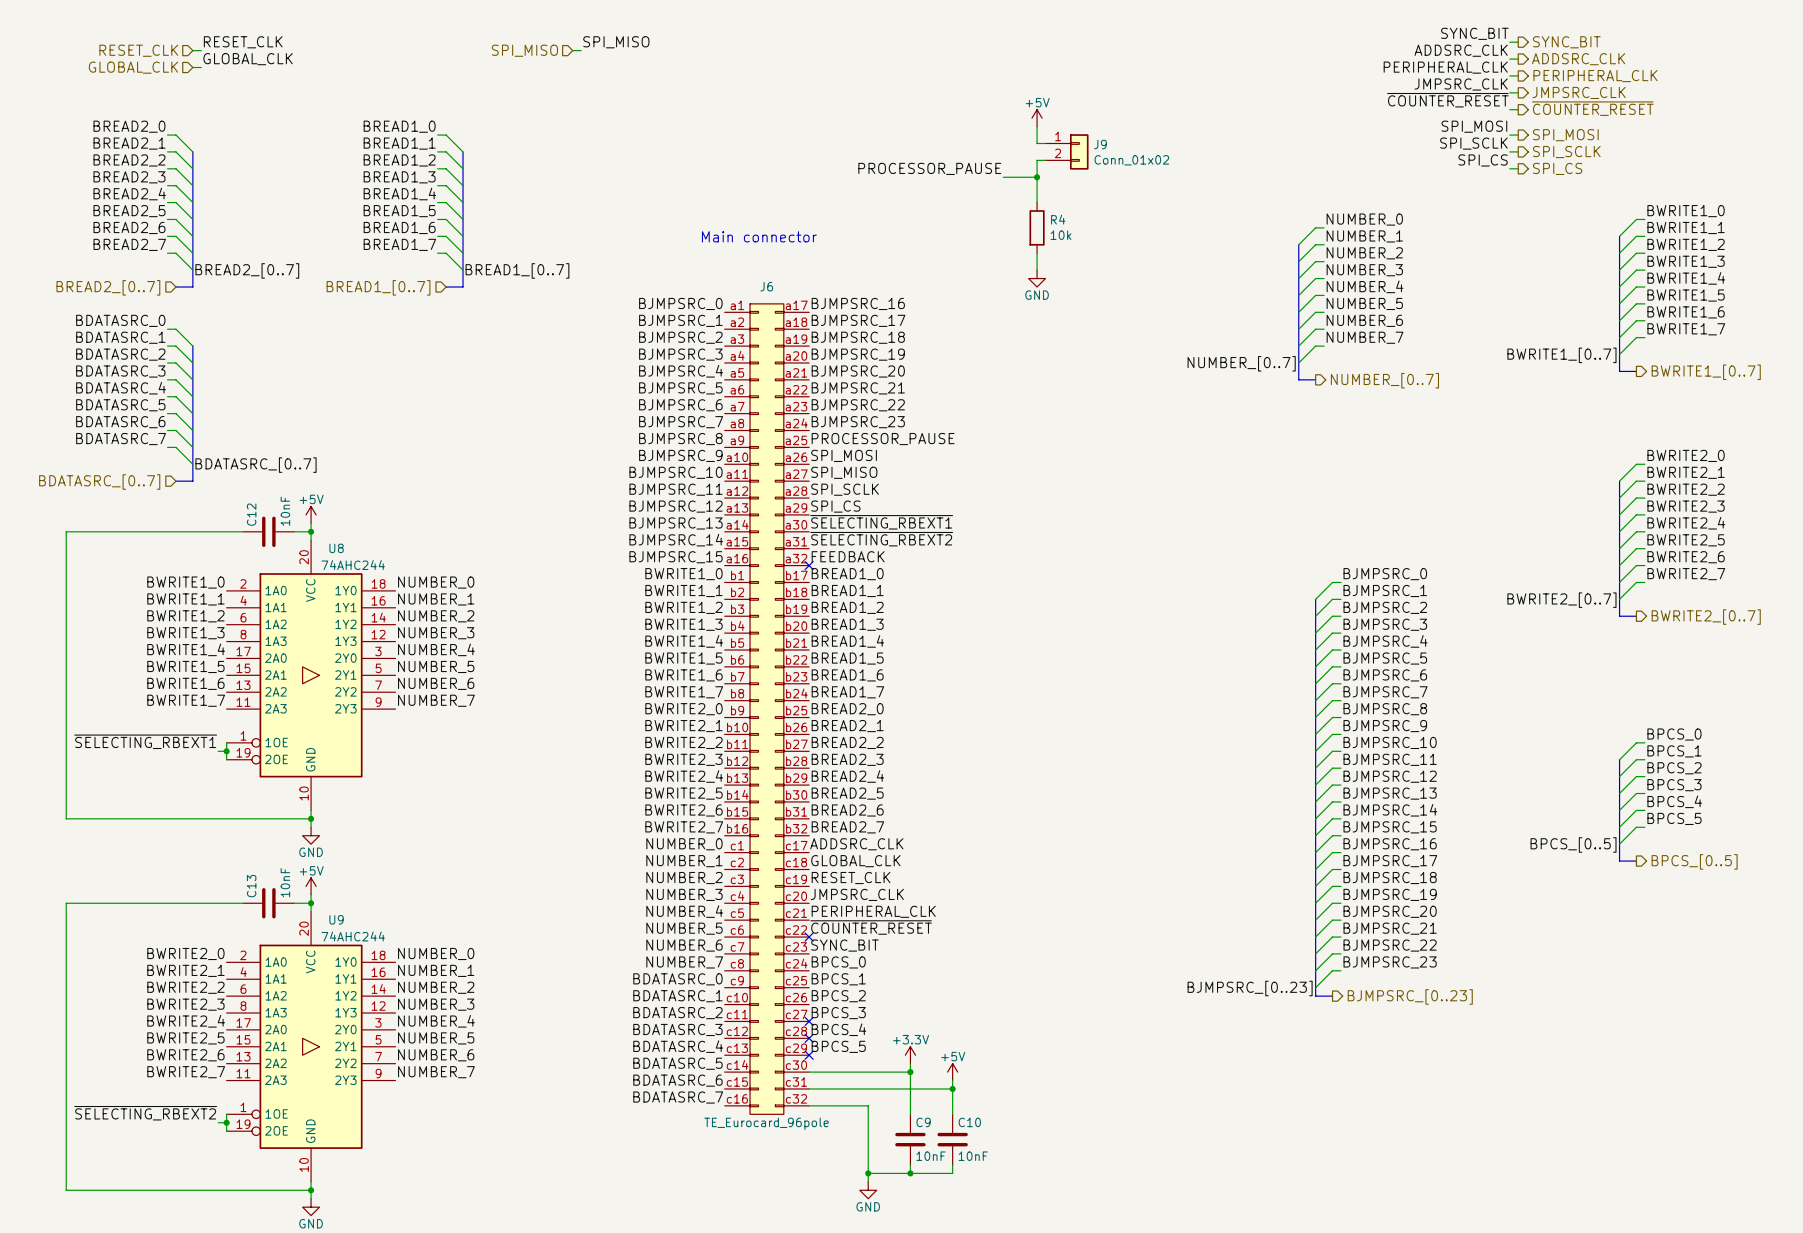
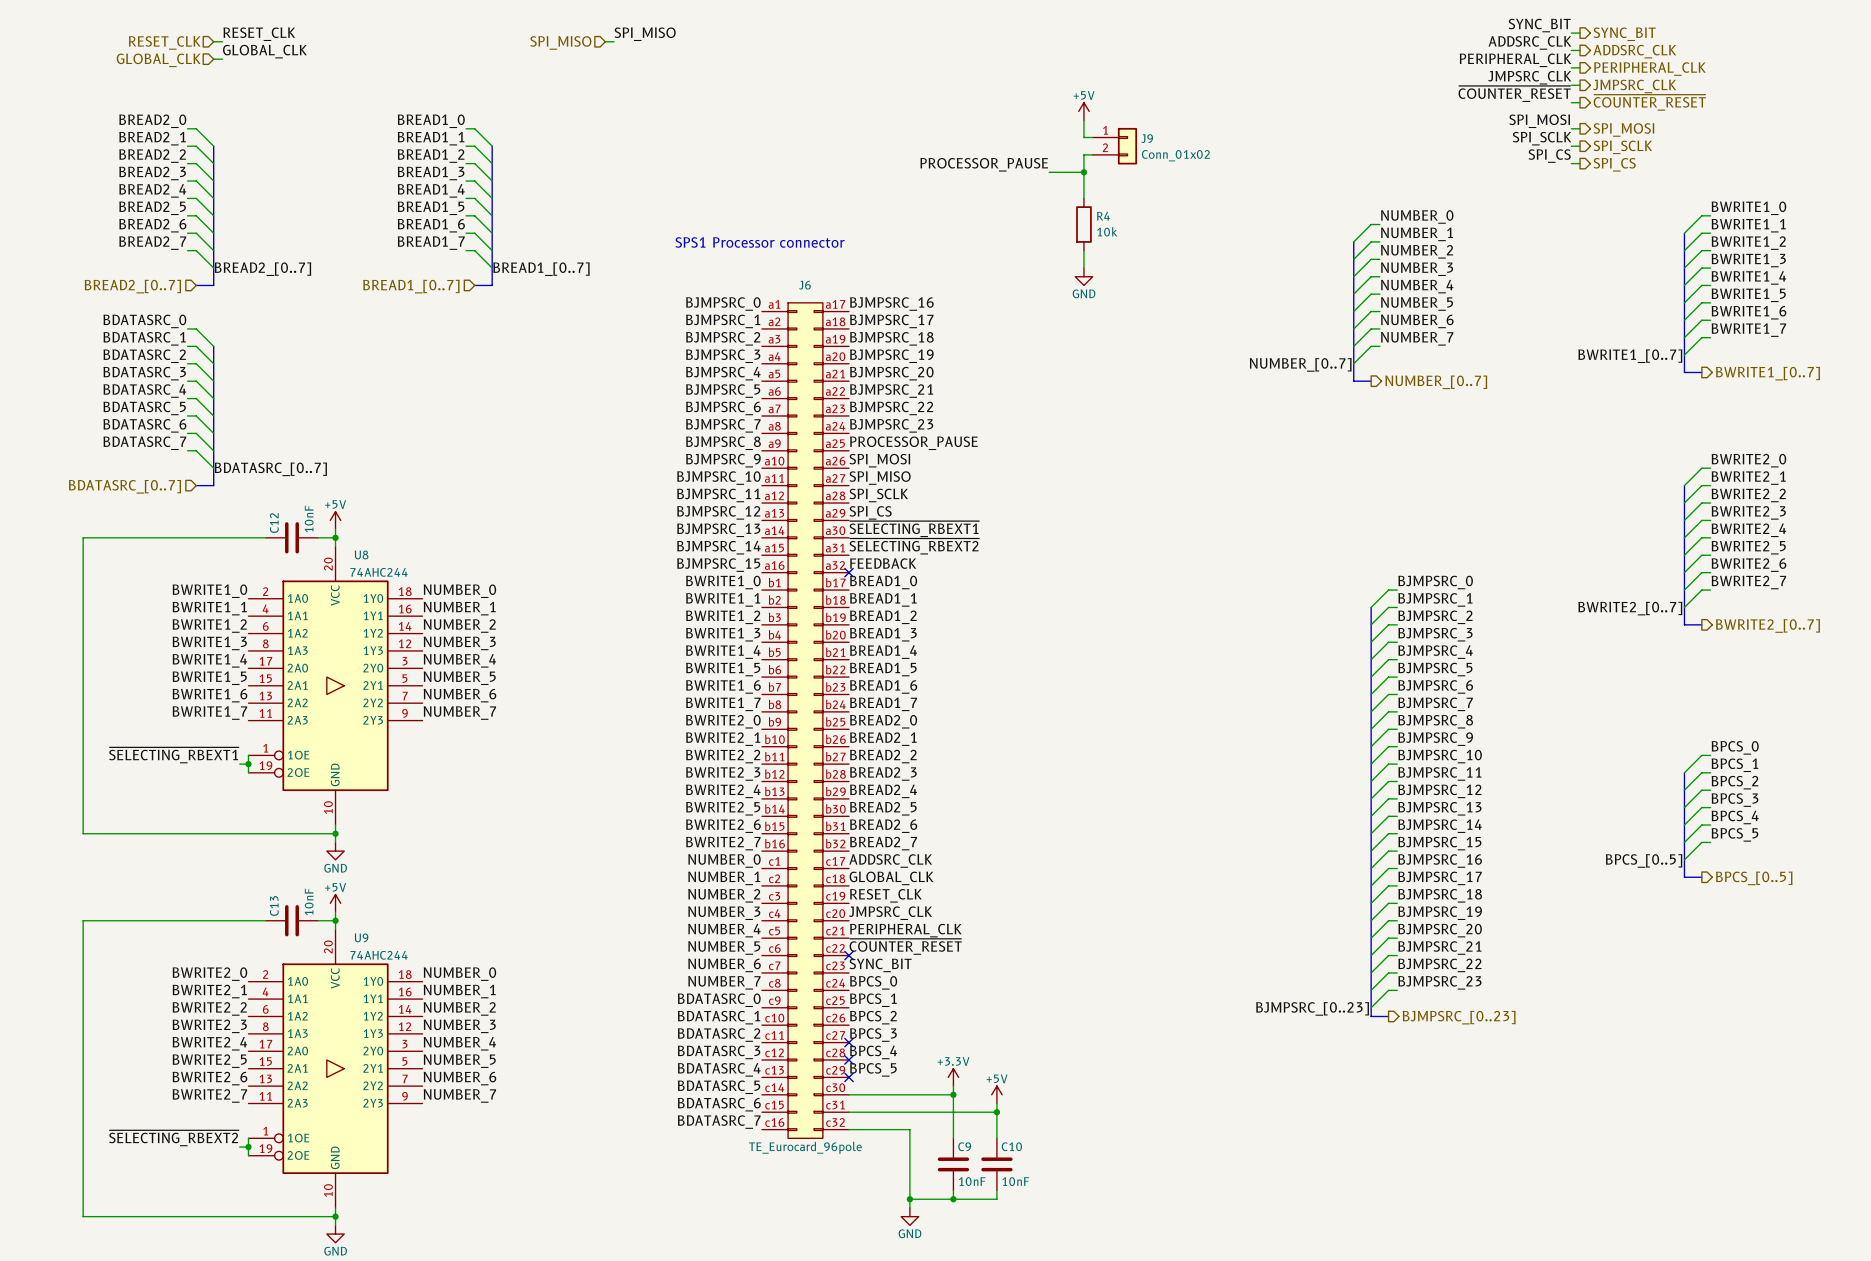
text: Main connector (759, 236) -> none
text: none -> SPS1 Processor connector (760, 242)

